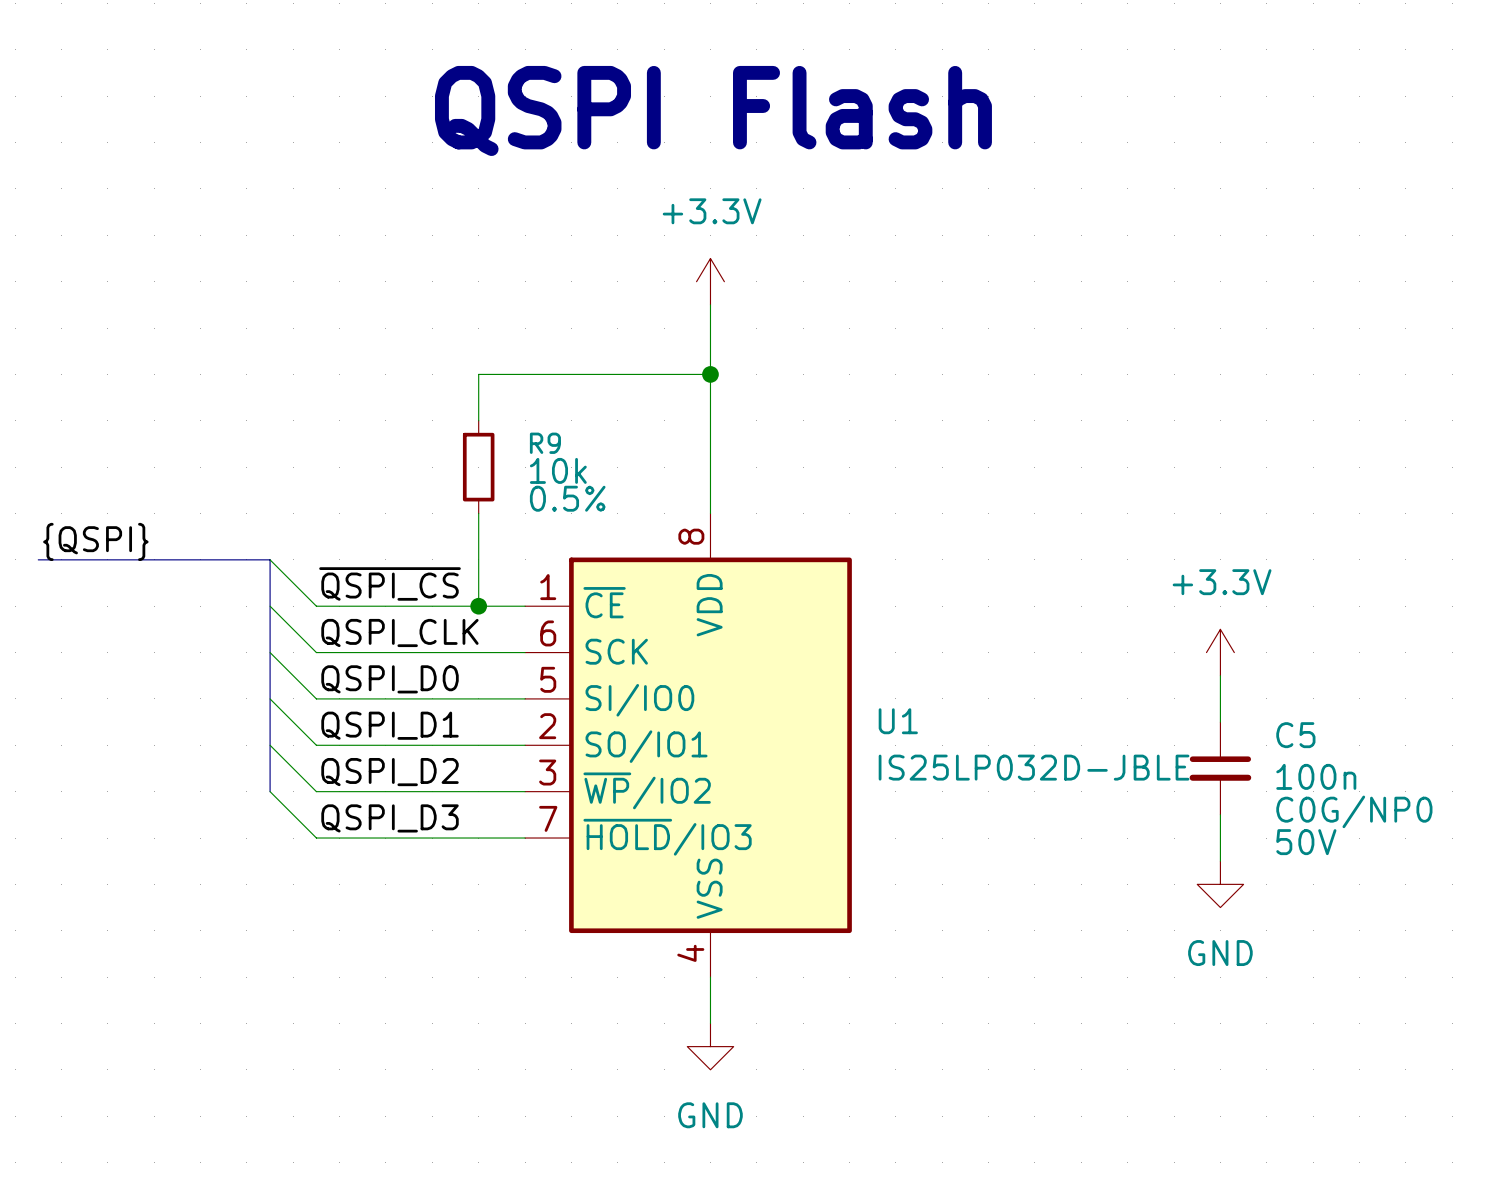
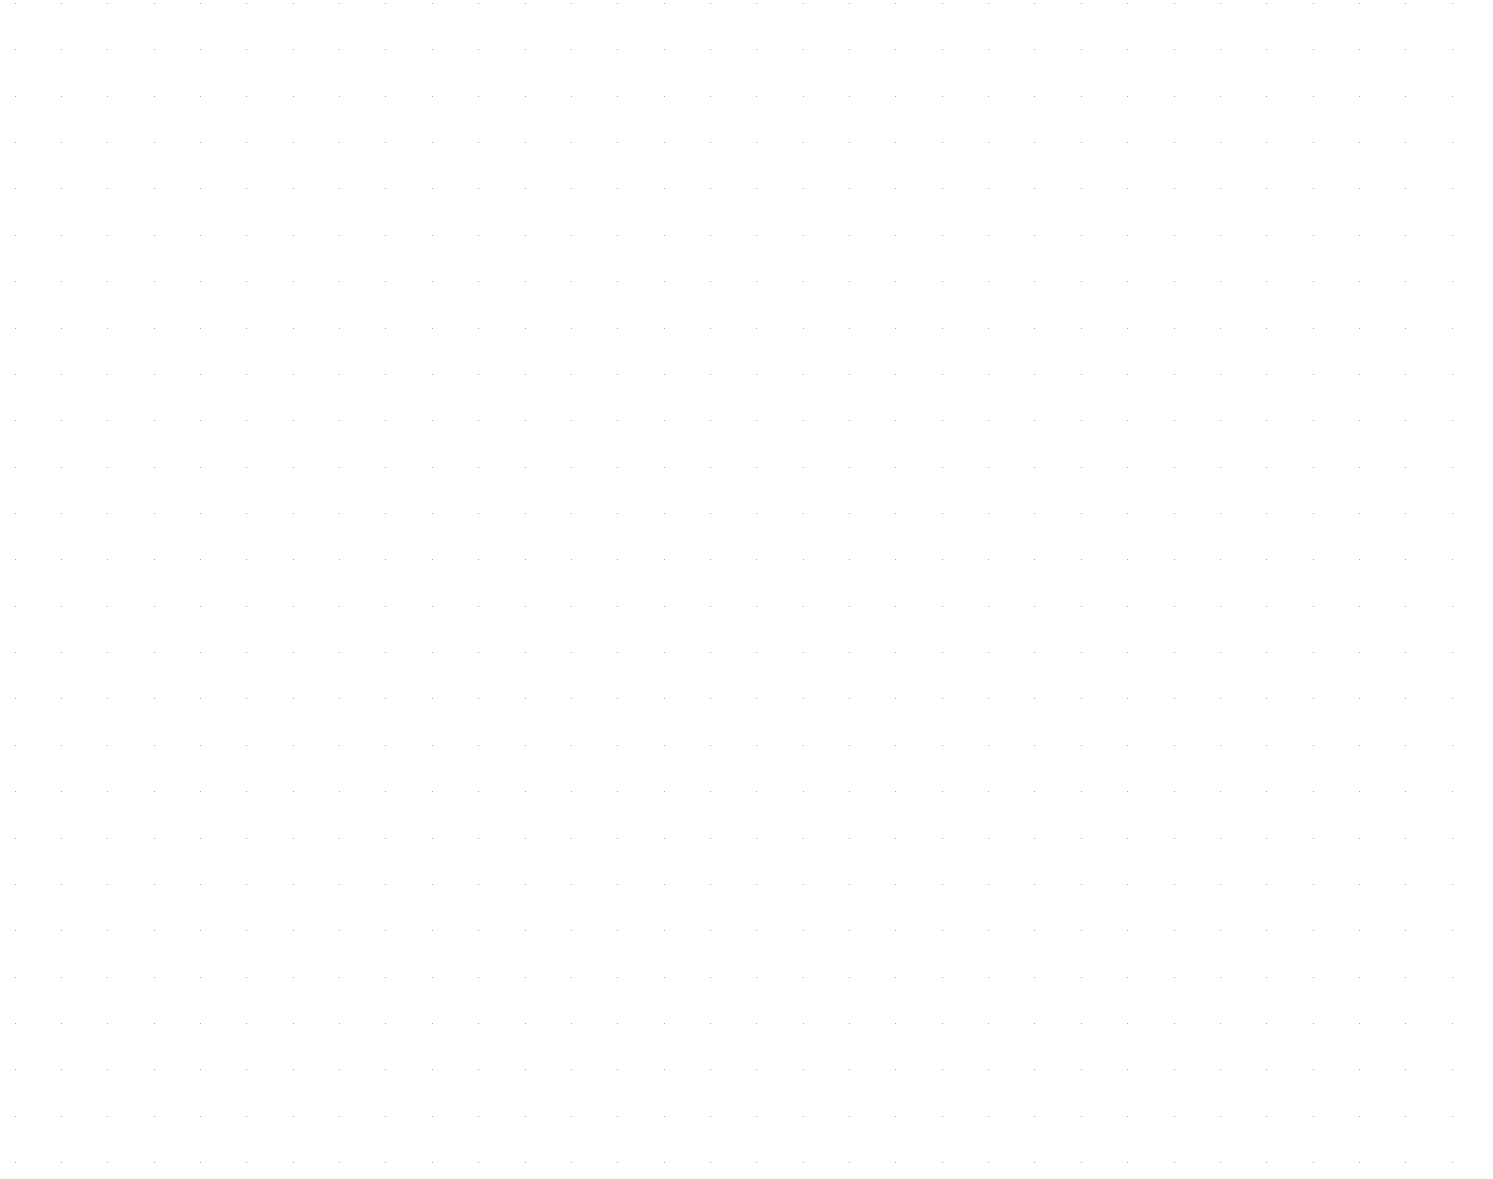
text: QSPI Flash (713, 110) -> none
power symbol: +3.3V (710, 281) -> none
wire: (710, 304) (710, 513) -> none
wire: (710, 374) (478, 374) (478, 420) -> none
junction: (710, 374) -> none
R9: 10k (478, 467) -> none
wire: (478, 513) (478, 606) -> none
label: {QSPI} (95, 541) -> none
bus: (38, 559) (270, 559) (270, 791) -> none
wire: (270, 559) (316, 606) (525, 606) -> none
label: ~{QSPI_CS} (390, 583) -> none
wire: (270, 606) (316, 652) (525, 652) -> none
junction: (478, 606) -> none
label: QSPI_CLK (399, 632) -> none
wire: (270, 652) (316, 698) (525, 698) -> none
power symbol: +3.3V (1220, 652) -> none
wire: (1220, 675) (1220, 722) -> none
label: QSPI_D0 (390, 679) -> none
wire: (270, 698) (316, 745) (525, 745) -> none
label: QSPI_D1 (390, 725) -> none
wire: (270, 745) (316, 791) (525, 791) -> none
U1: IS25LP032D-JBLE (688, 745) -> none
C5: 100n (1220, 768) -> none
label: QSPI_D2 (390, 772) -> none
wire: (270, 791) (316, 838) (525, 838) -> none
wire: (1220, 814) (1220, 861) -> none
label: QSPI_D3 (390, 818) -> none
power symbol: GND (1220, 884) -> none
wire: (710, 977) (710, 1023) -> none
power symbol: GND (710, 1046) -> none

